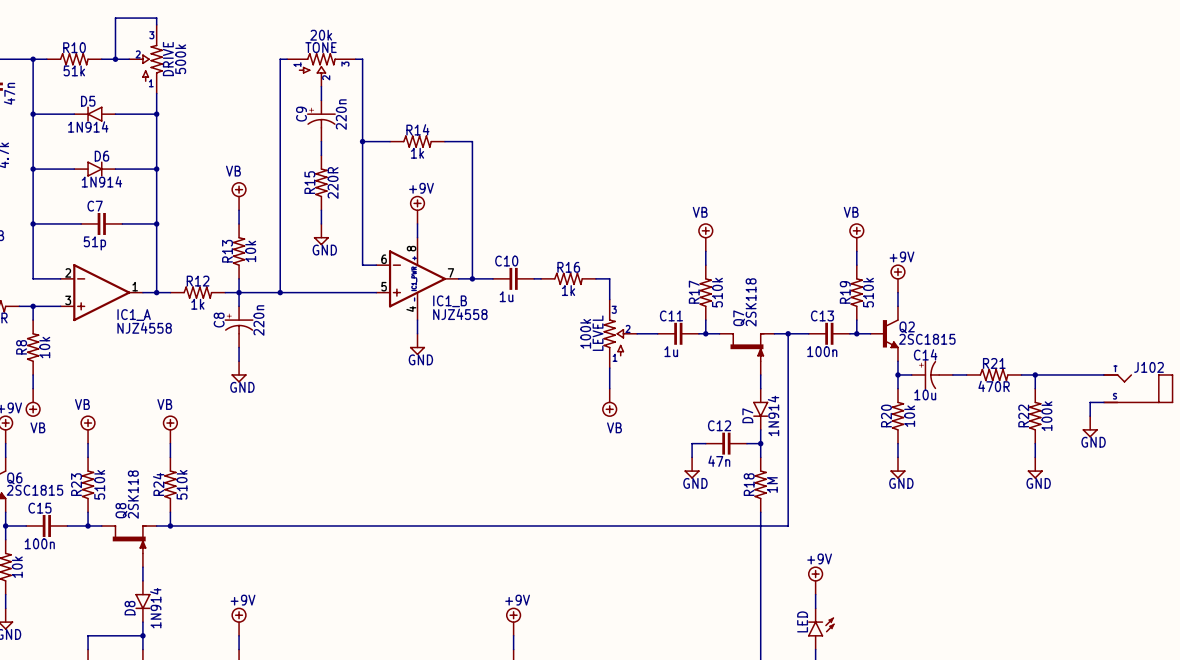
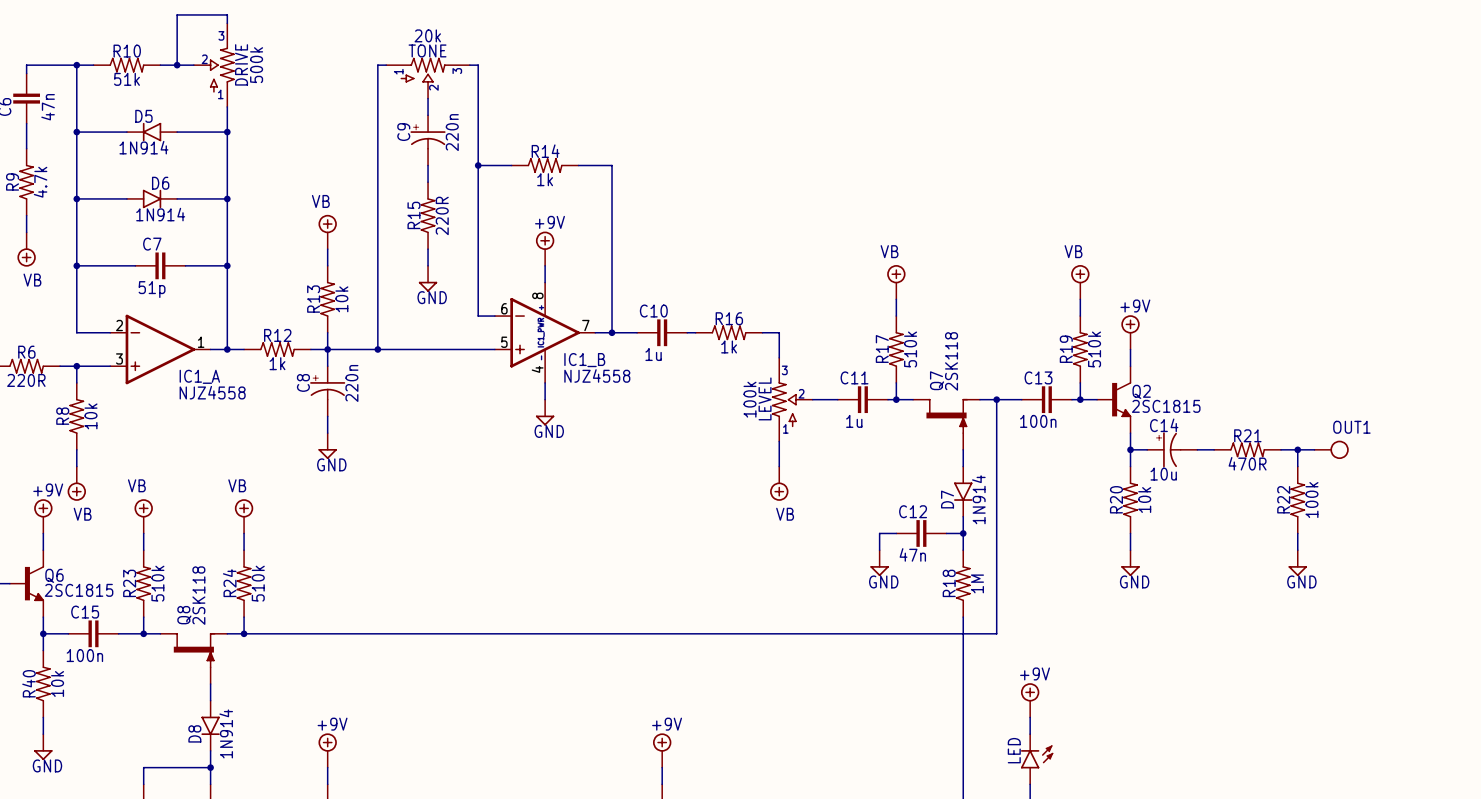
wire: (1049, 374) (1103, 374) -> none
OUT1: none -> (1331, 449)
J102: (1138, 388) -> none
wire: (1103, 402) (1090, 402) (1090, 416) -> none
power symbol: GND (1090, 426) -> none

